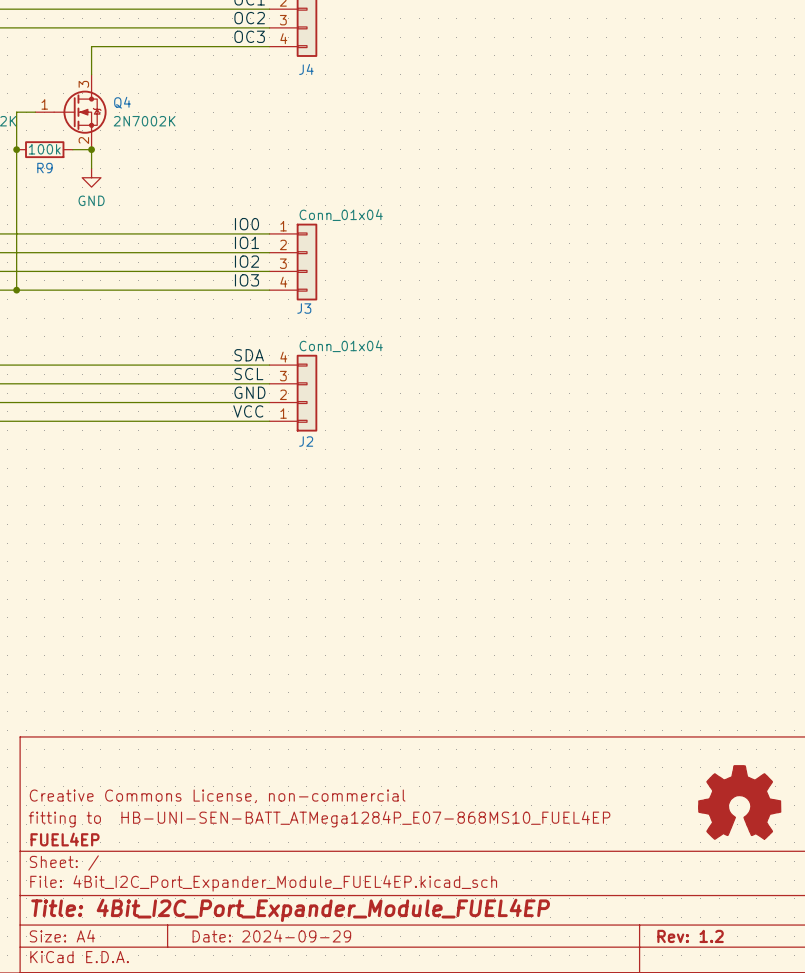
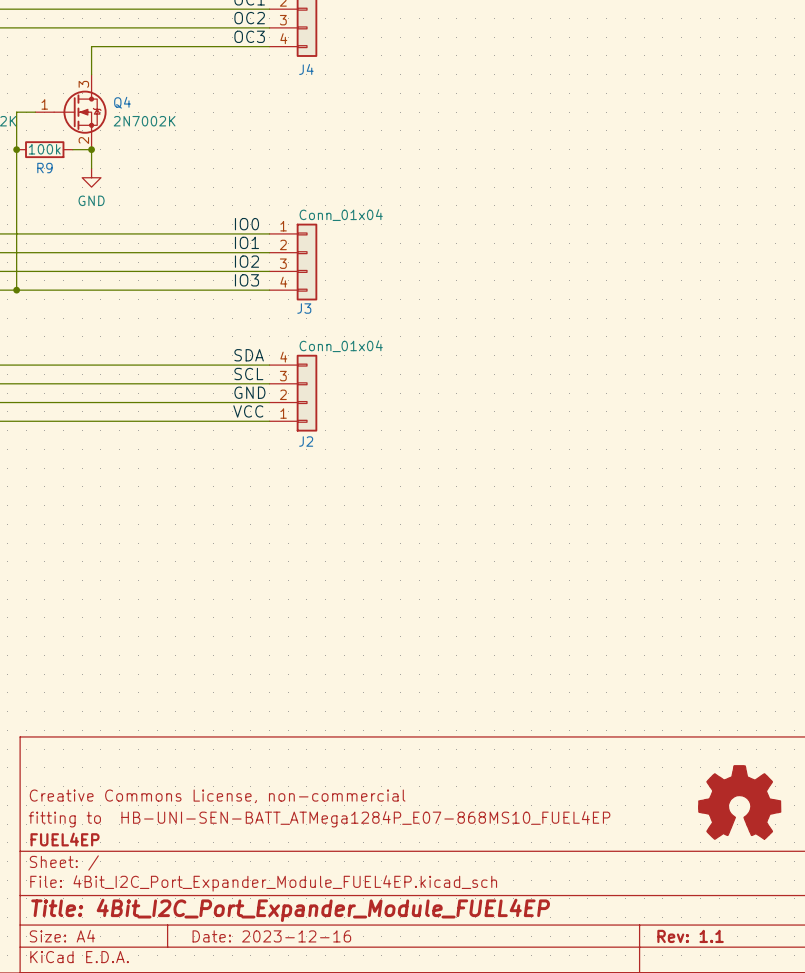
title block: Date: 2024-09-29 (271, 936) -> Date: 2023-12-16 (271, 936)
title block: Rev: 1.2 (690, 936) -> Rev: 1.1 (690, 936)

